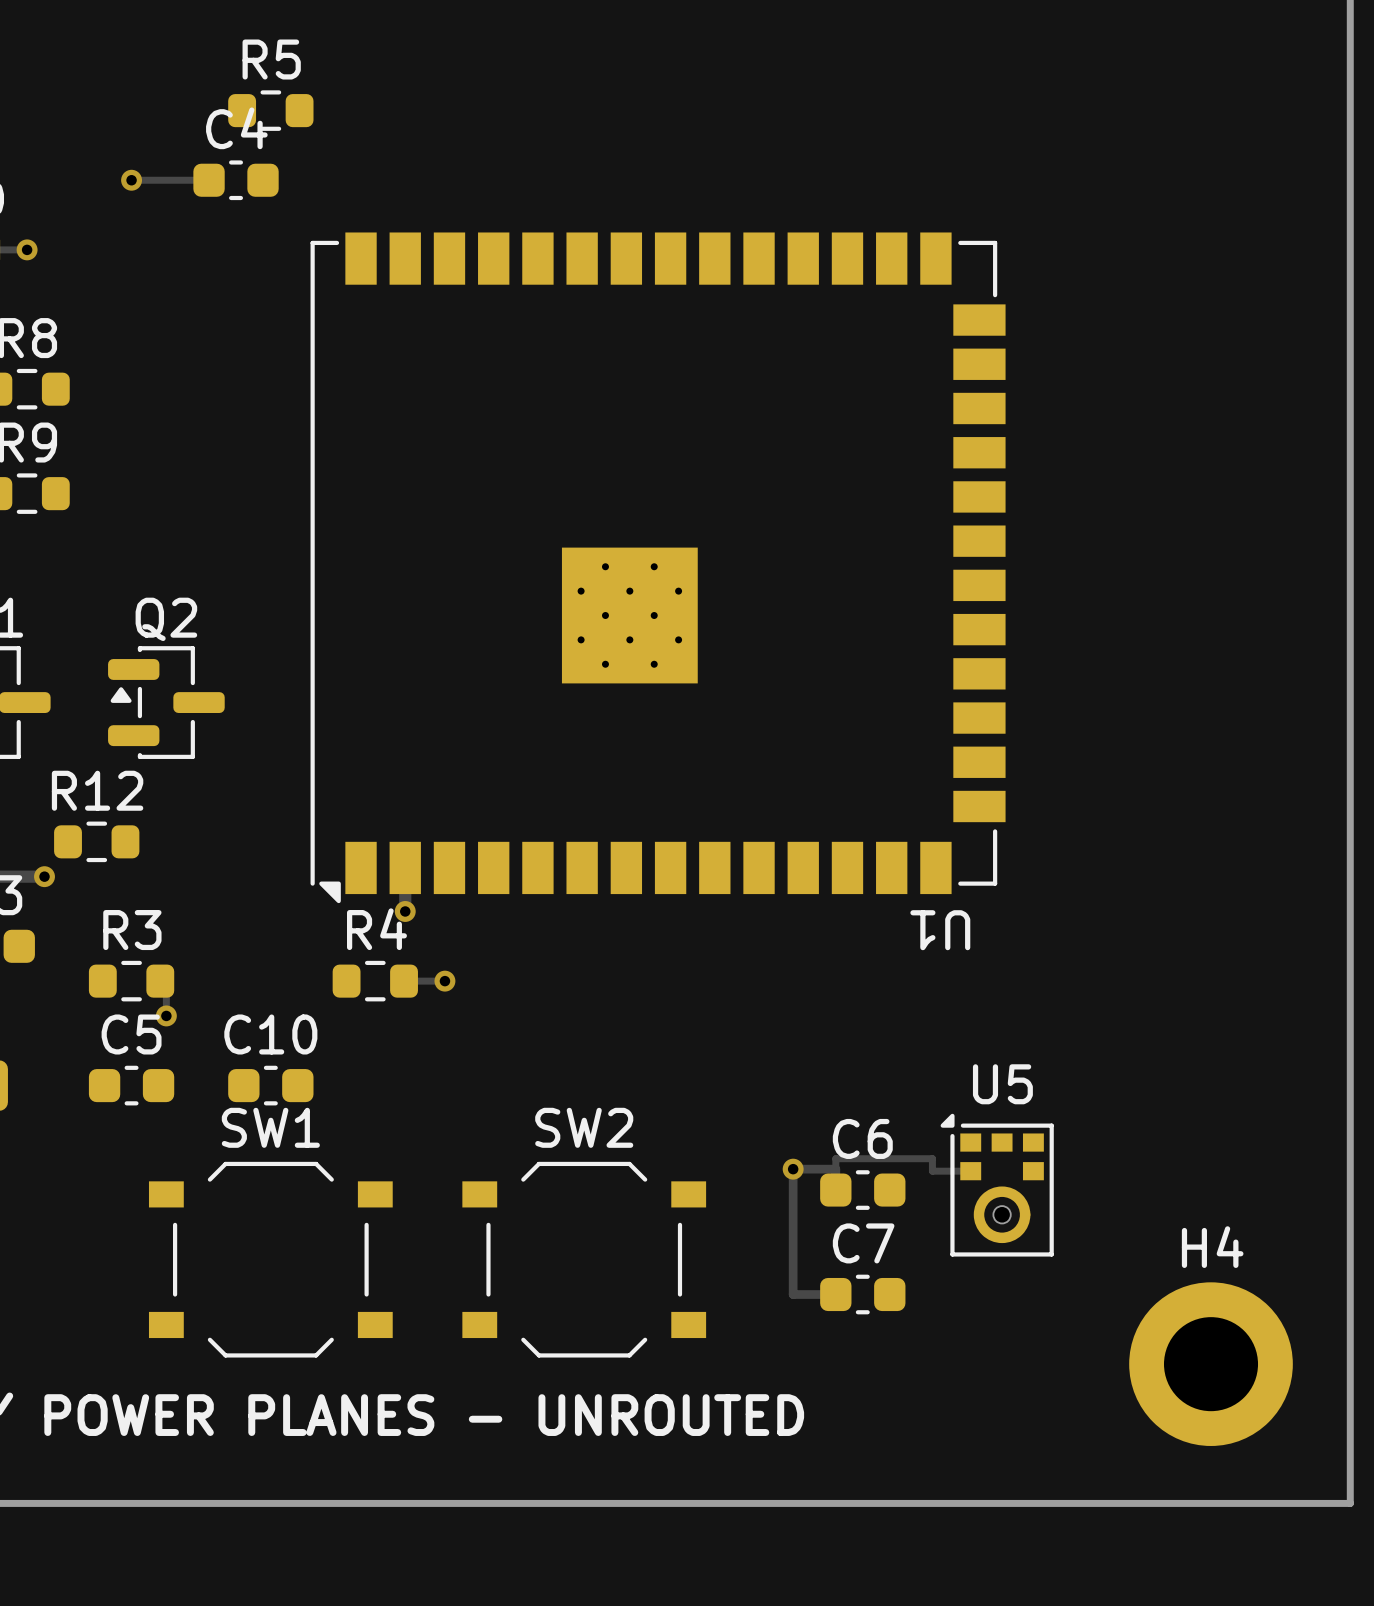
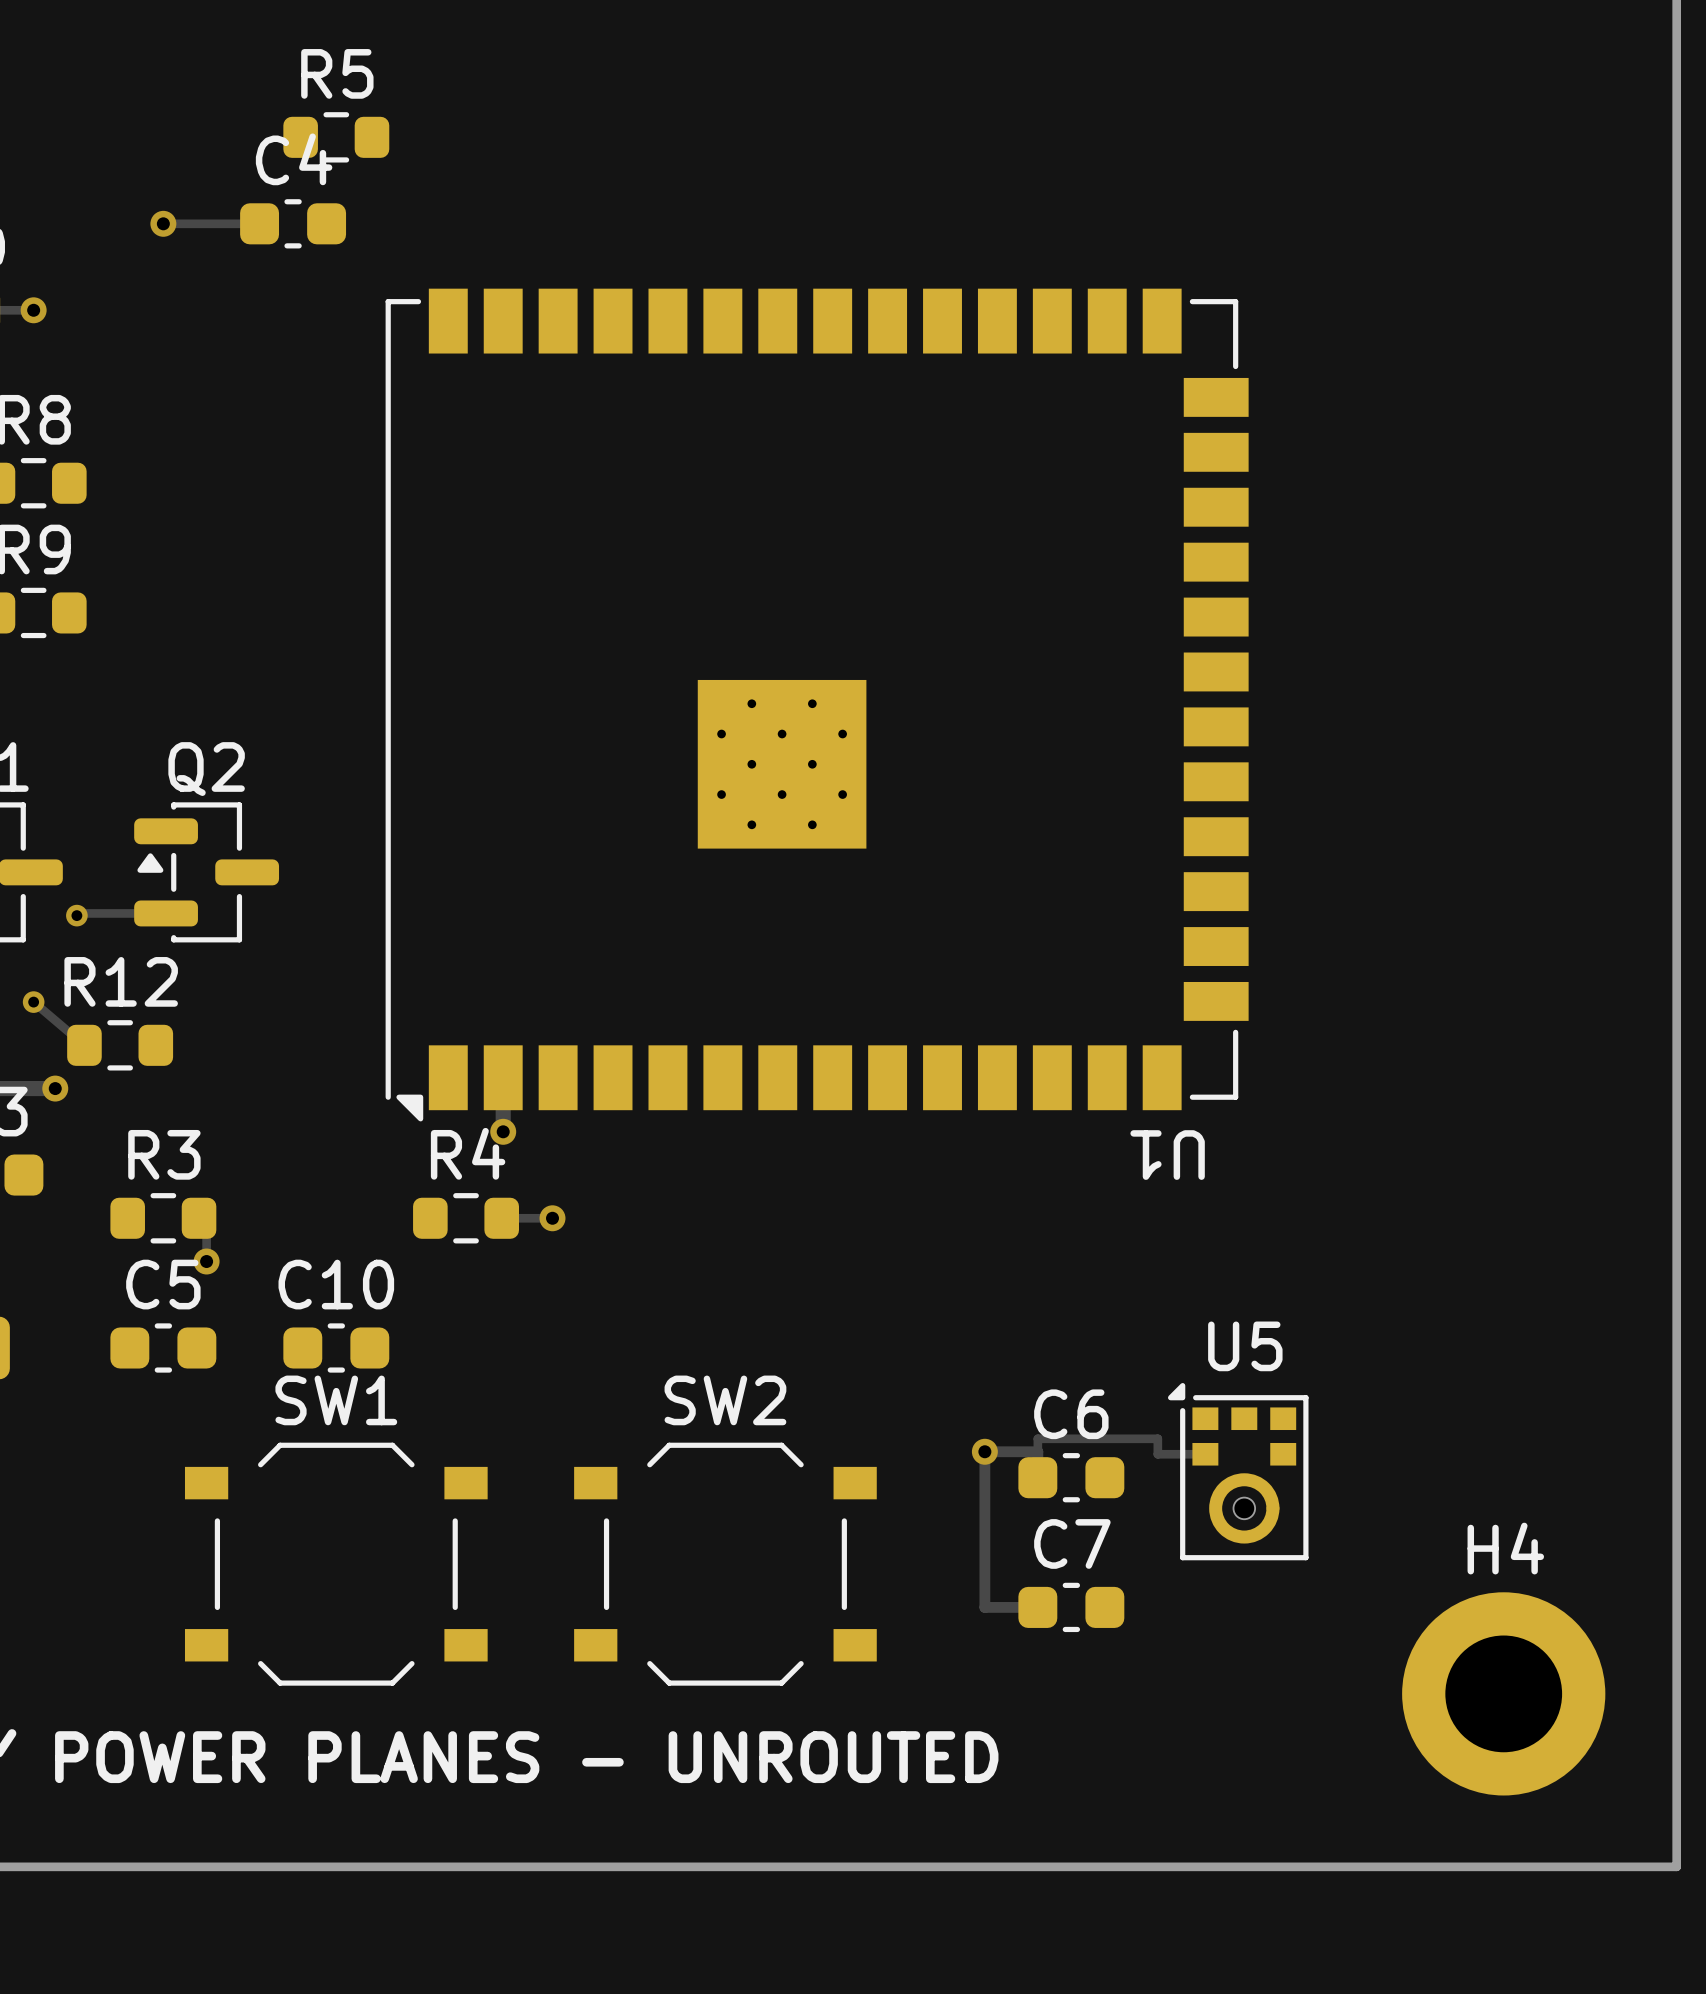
track: none -> (166, 913) (76, 913) (76, 915)
via: none -> (76, 915)
track: none -> (33, 1002) (84, 1045)
via: none -> (33, 1002)

